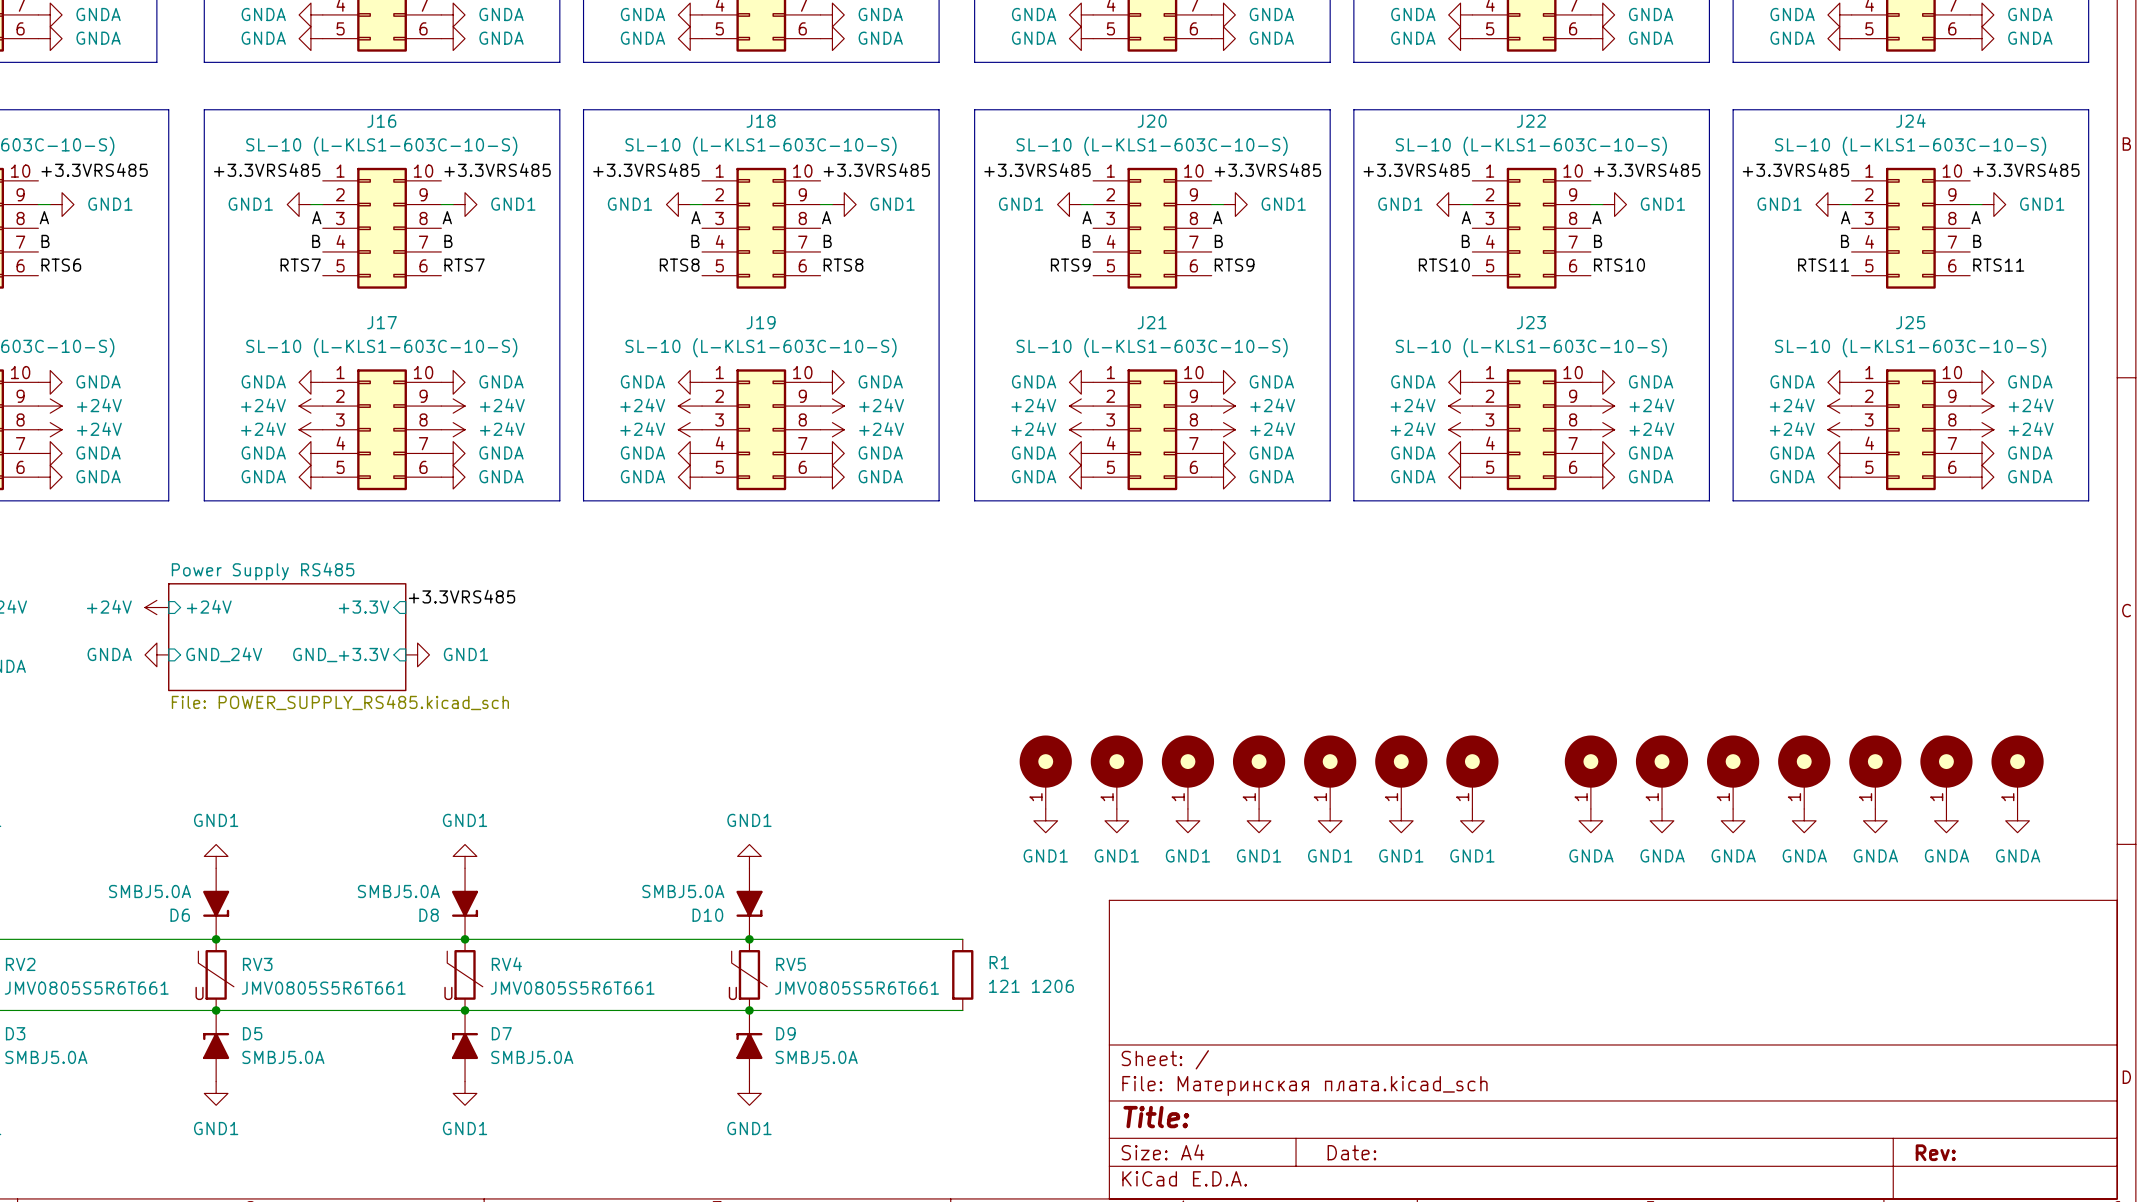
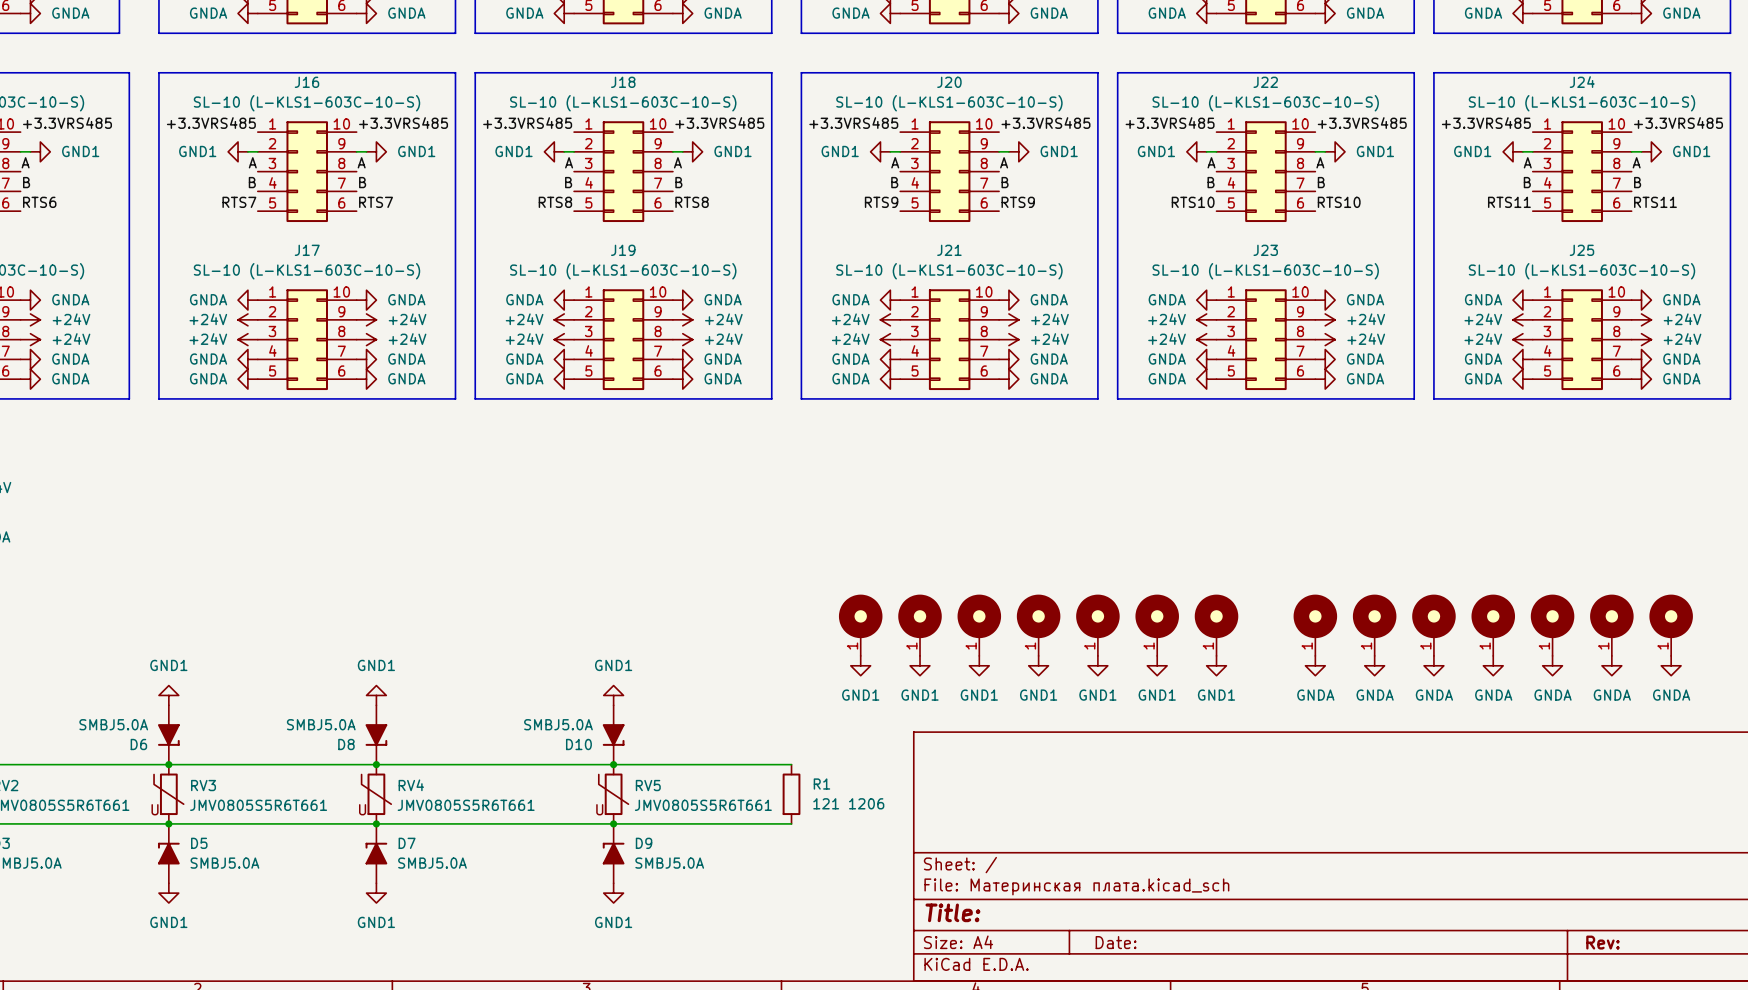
label: +3.3VRS485 (462, 596) -> none
sheet pin: +24V (209, 606) -> none
power symbol: +24V (156, 607) -> none
sheet pin: +3.3V (364, 607) -> none
sheet Power Supply RS485: File: POWER_SUPPLY_RS485.kicad_sch (287, 637) -> none
power symbol: GNDA (156, 654) -> none
sheet pin: GND_24V (224, 654) -> none
power symbol: GND1 (417, 654) -> none
sheet pin: GND_+3.3V (341, 655) -> none

